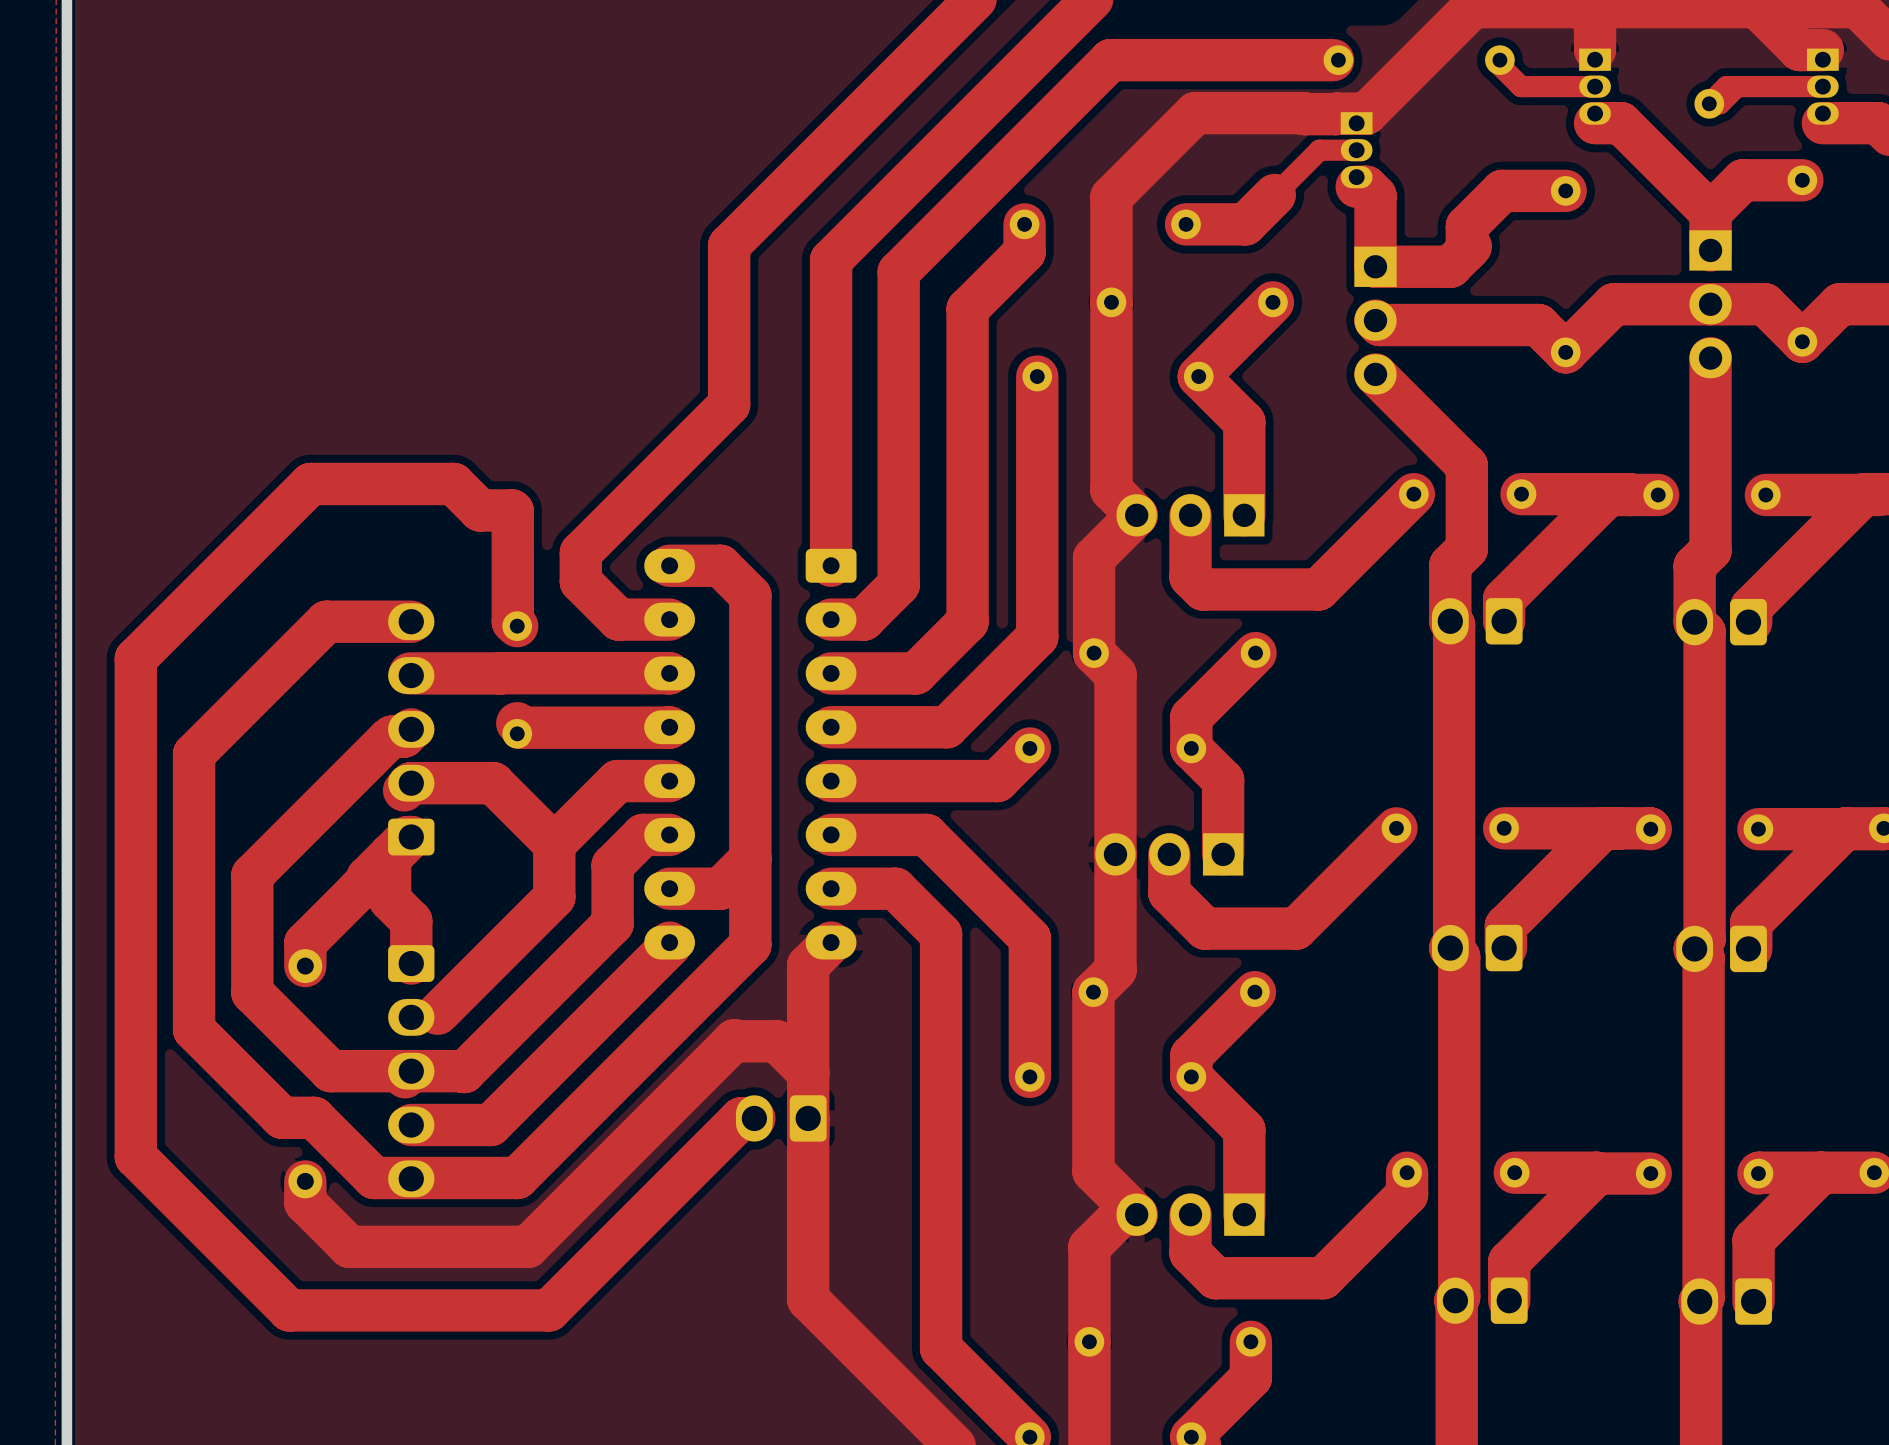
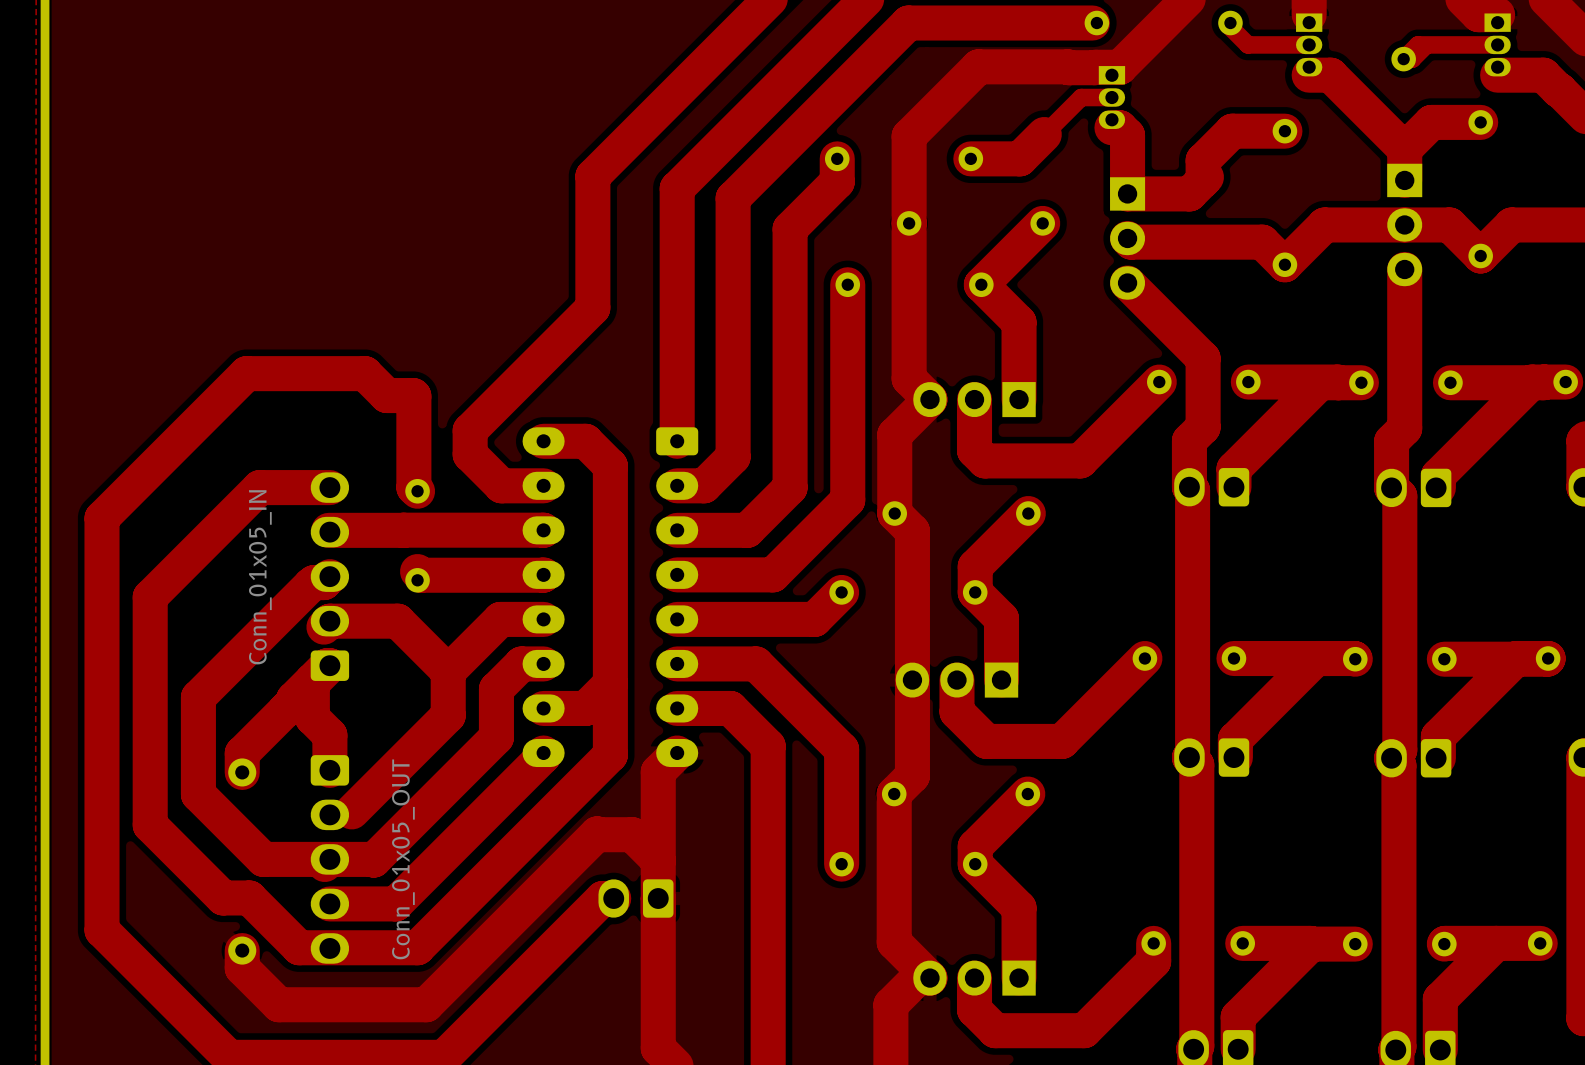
part value: none -> Conn_01x05_IN (260, 577)
part value: none -> Conn_01x05_OUT (403, 859)

